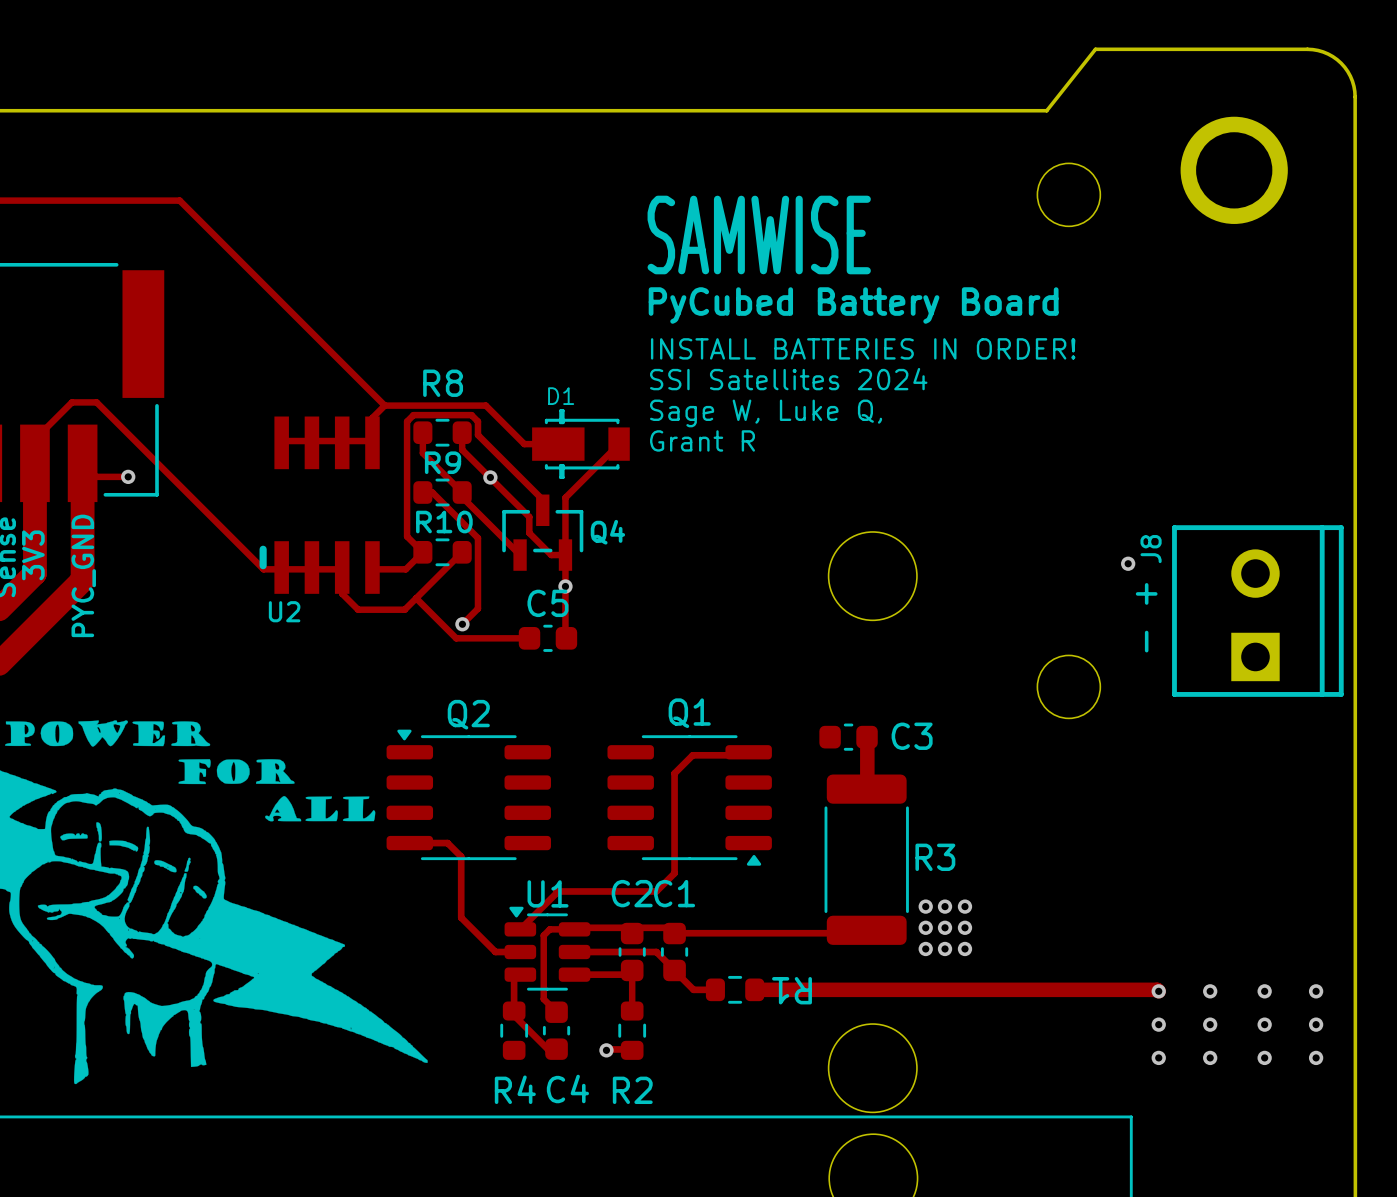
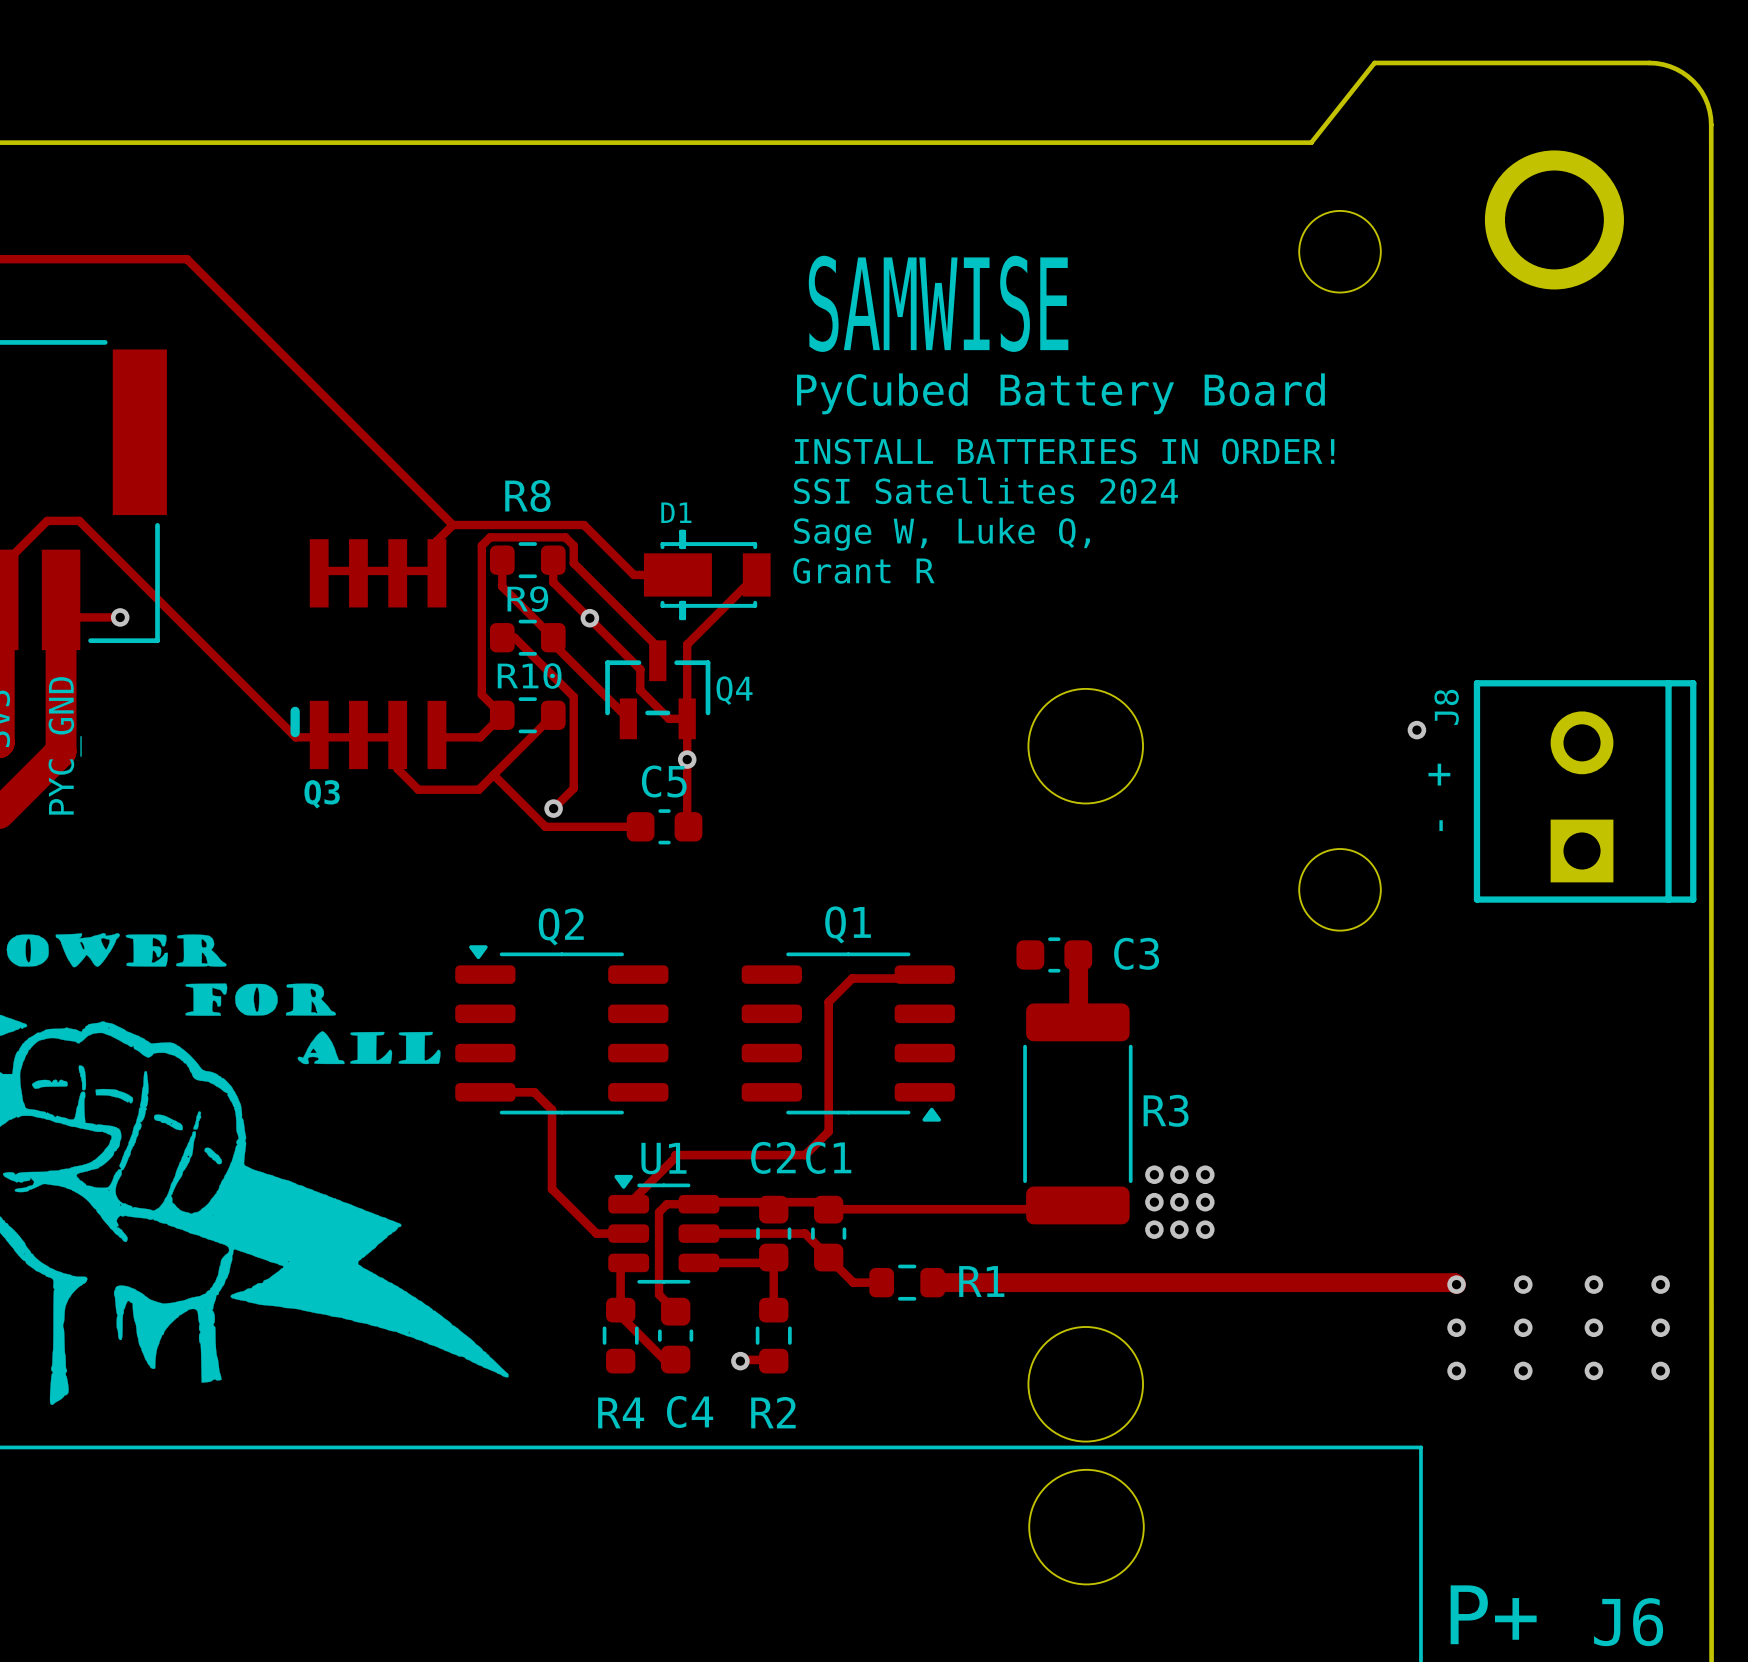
U2 name: U2 (284, 611) -> Q3 (322, 794)
R1 name rotation: 0° (792, 990) -> 180° (981, 1281)

